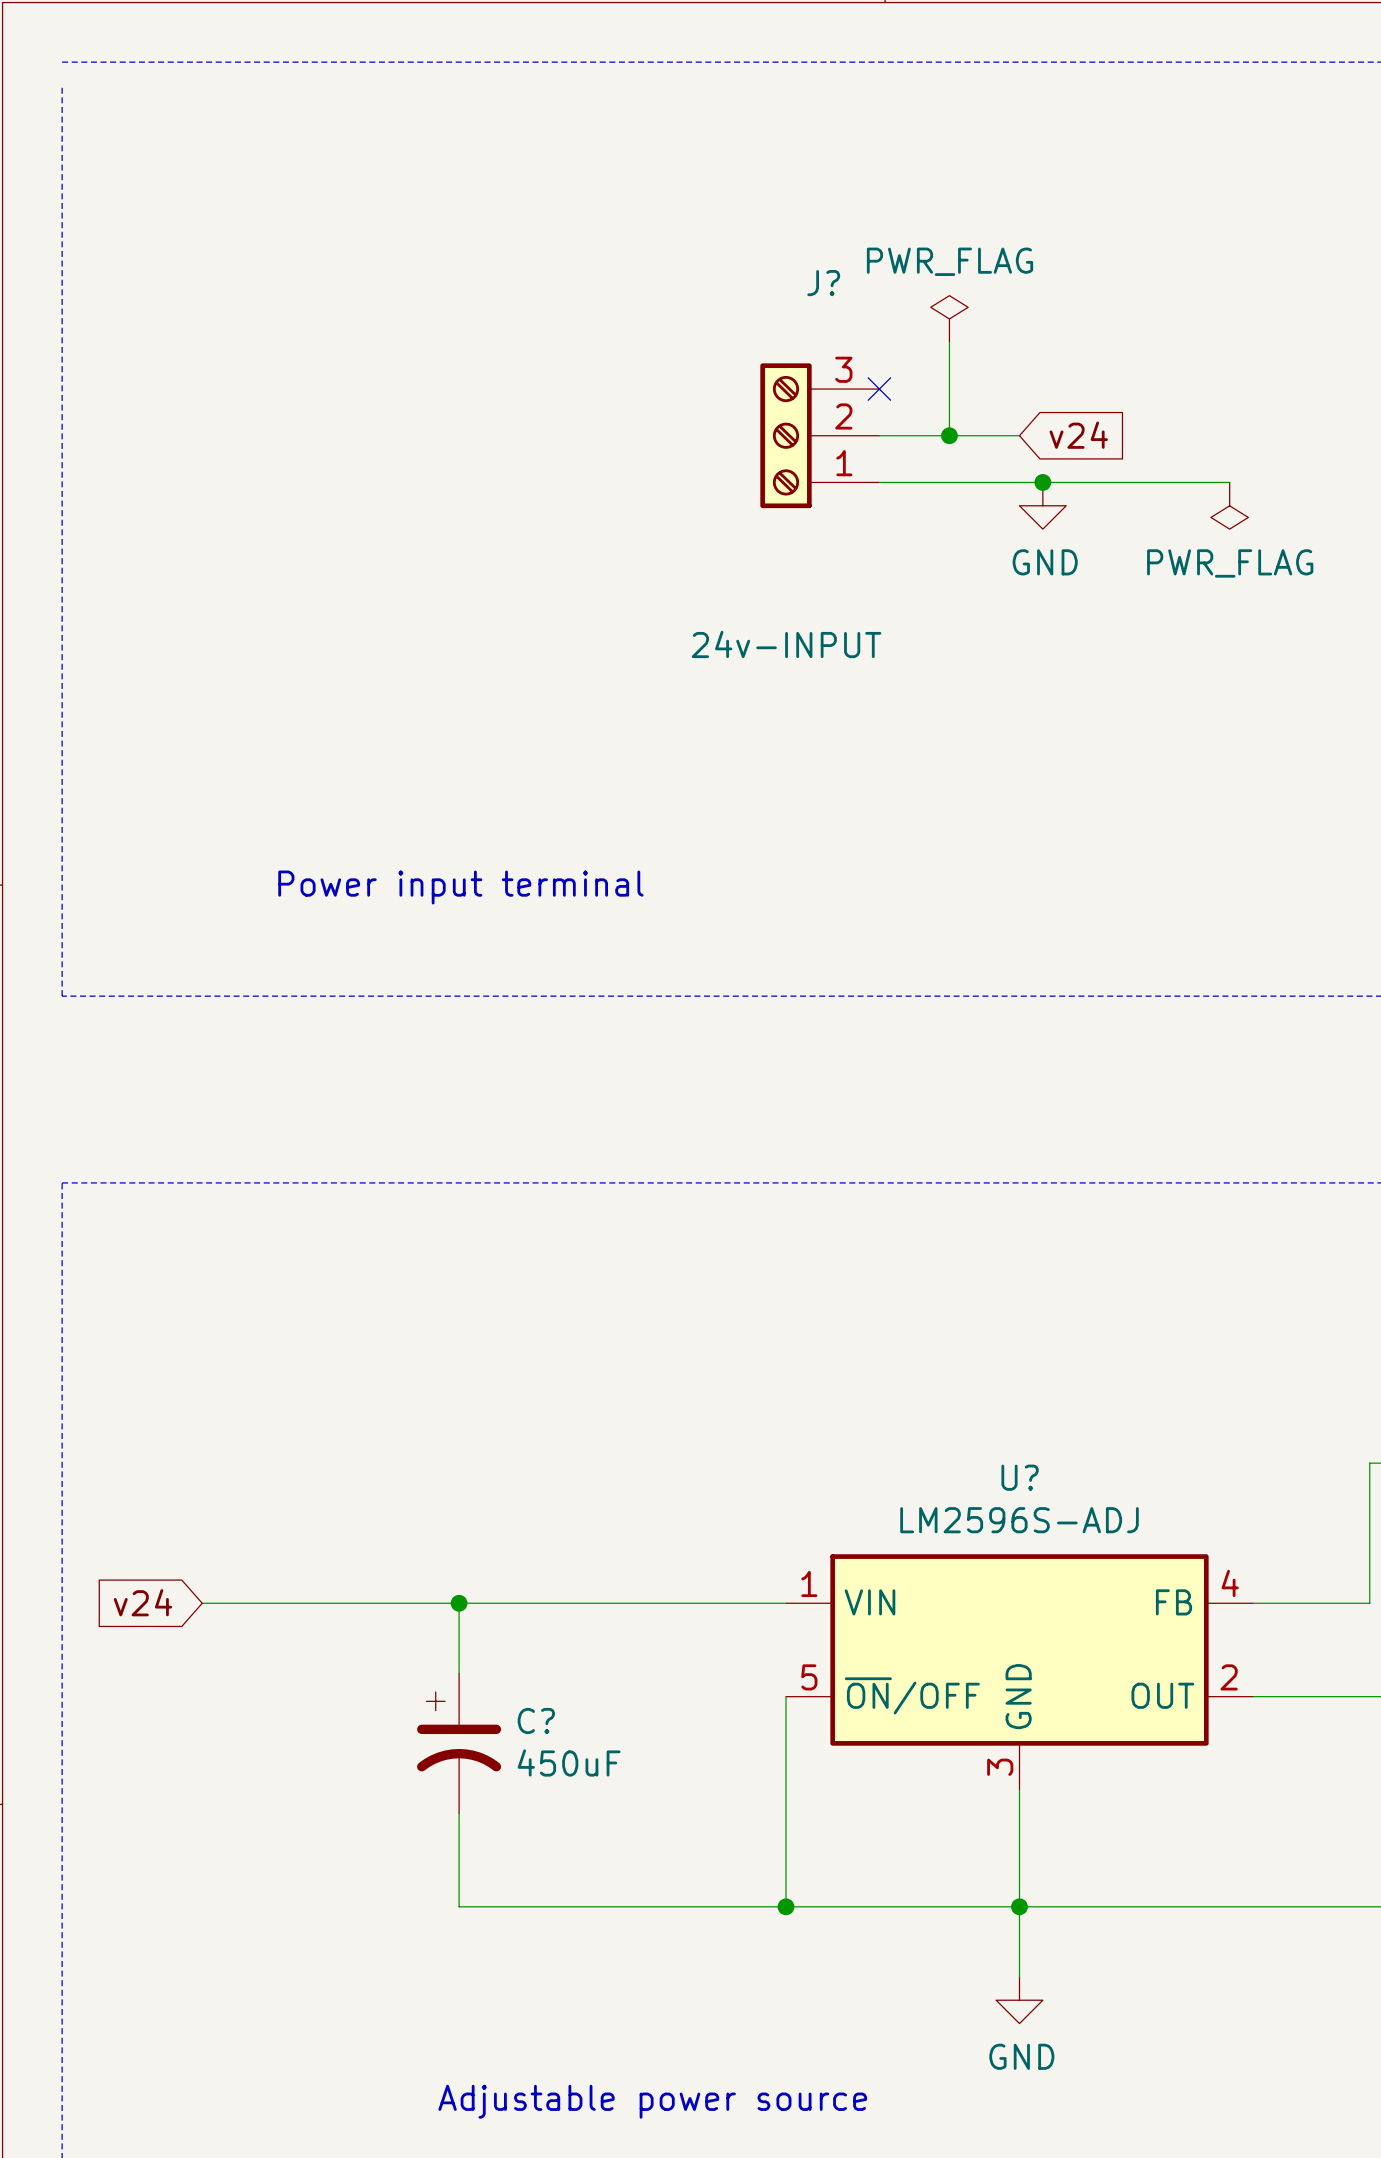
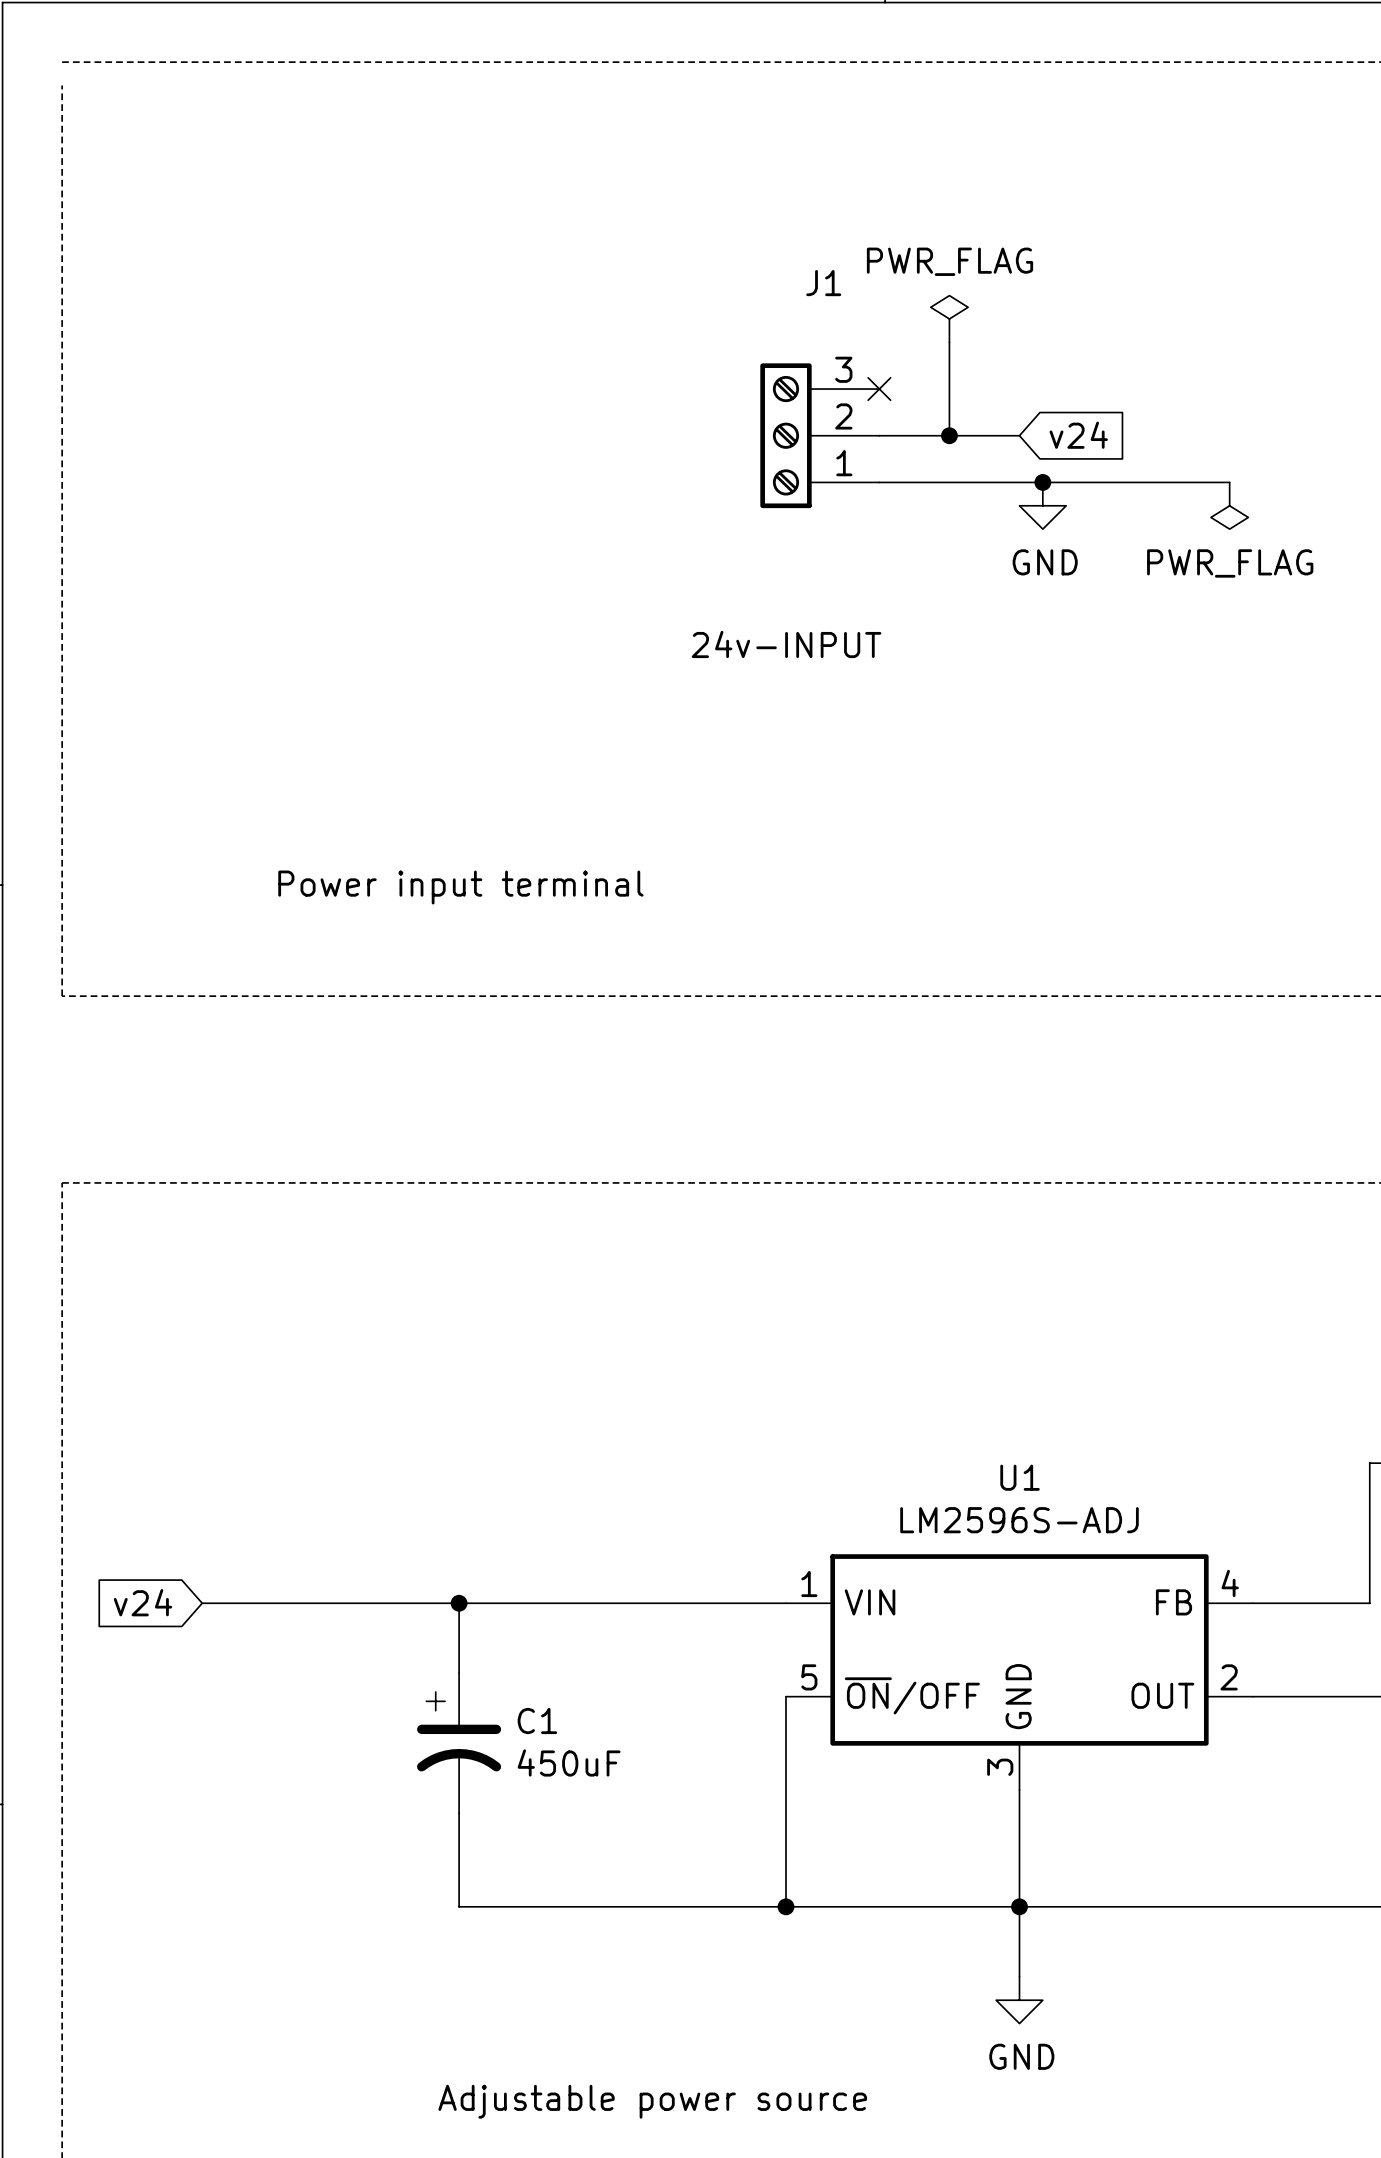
J? name: J? (823, 283) -> J1 (823, 283)
U? name: U? (1020, 1477) -> U1 (1020, 1477)
C? name: C? (536, 1721) -> C1 (537, 1721)

